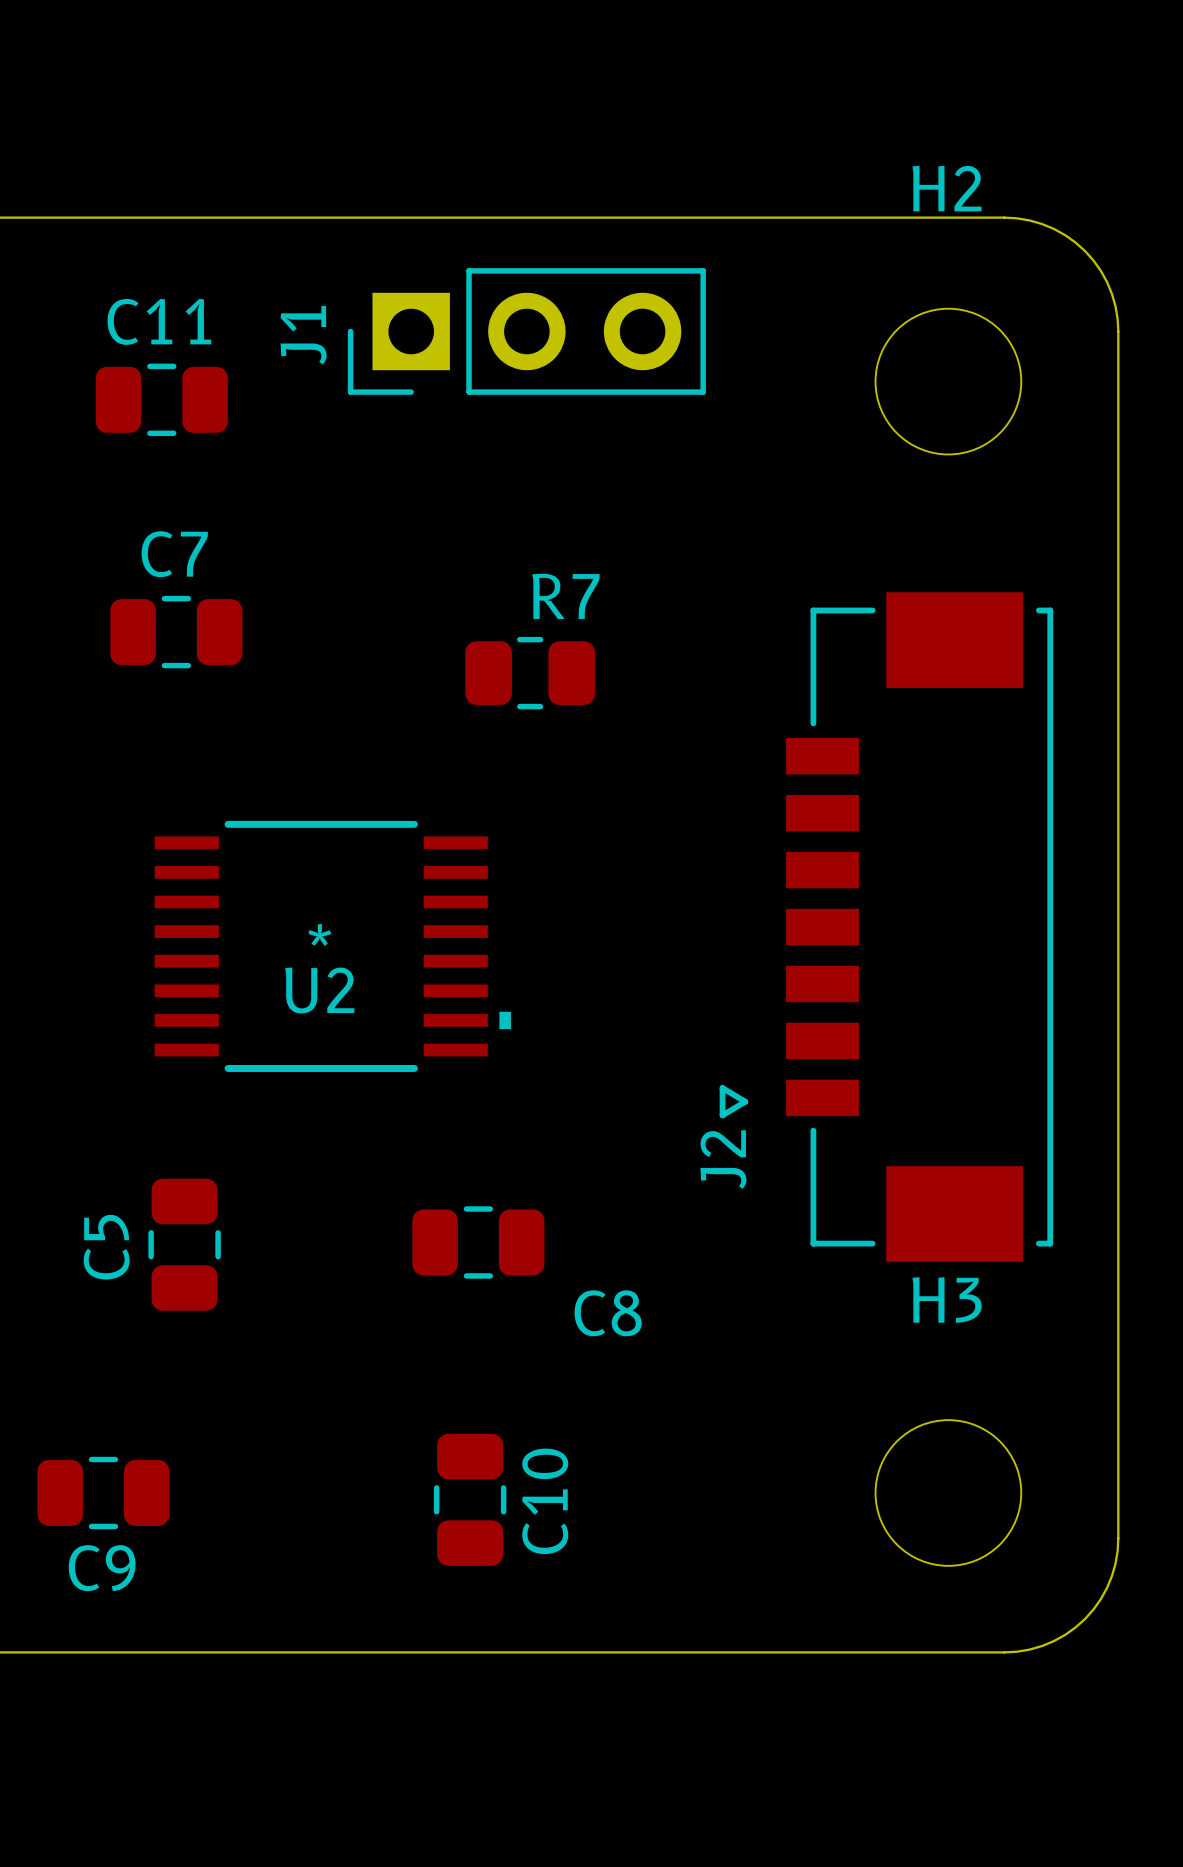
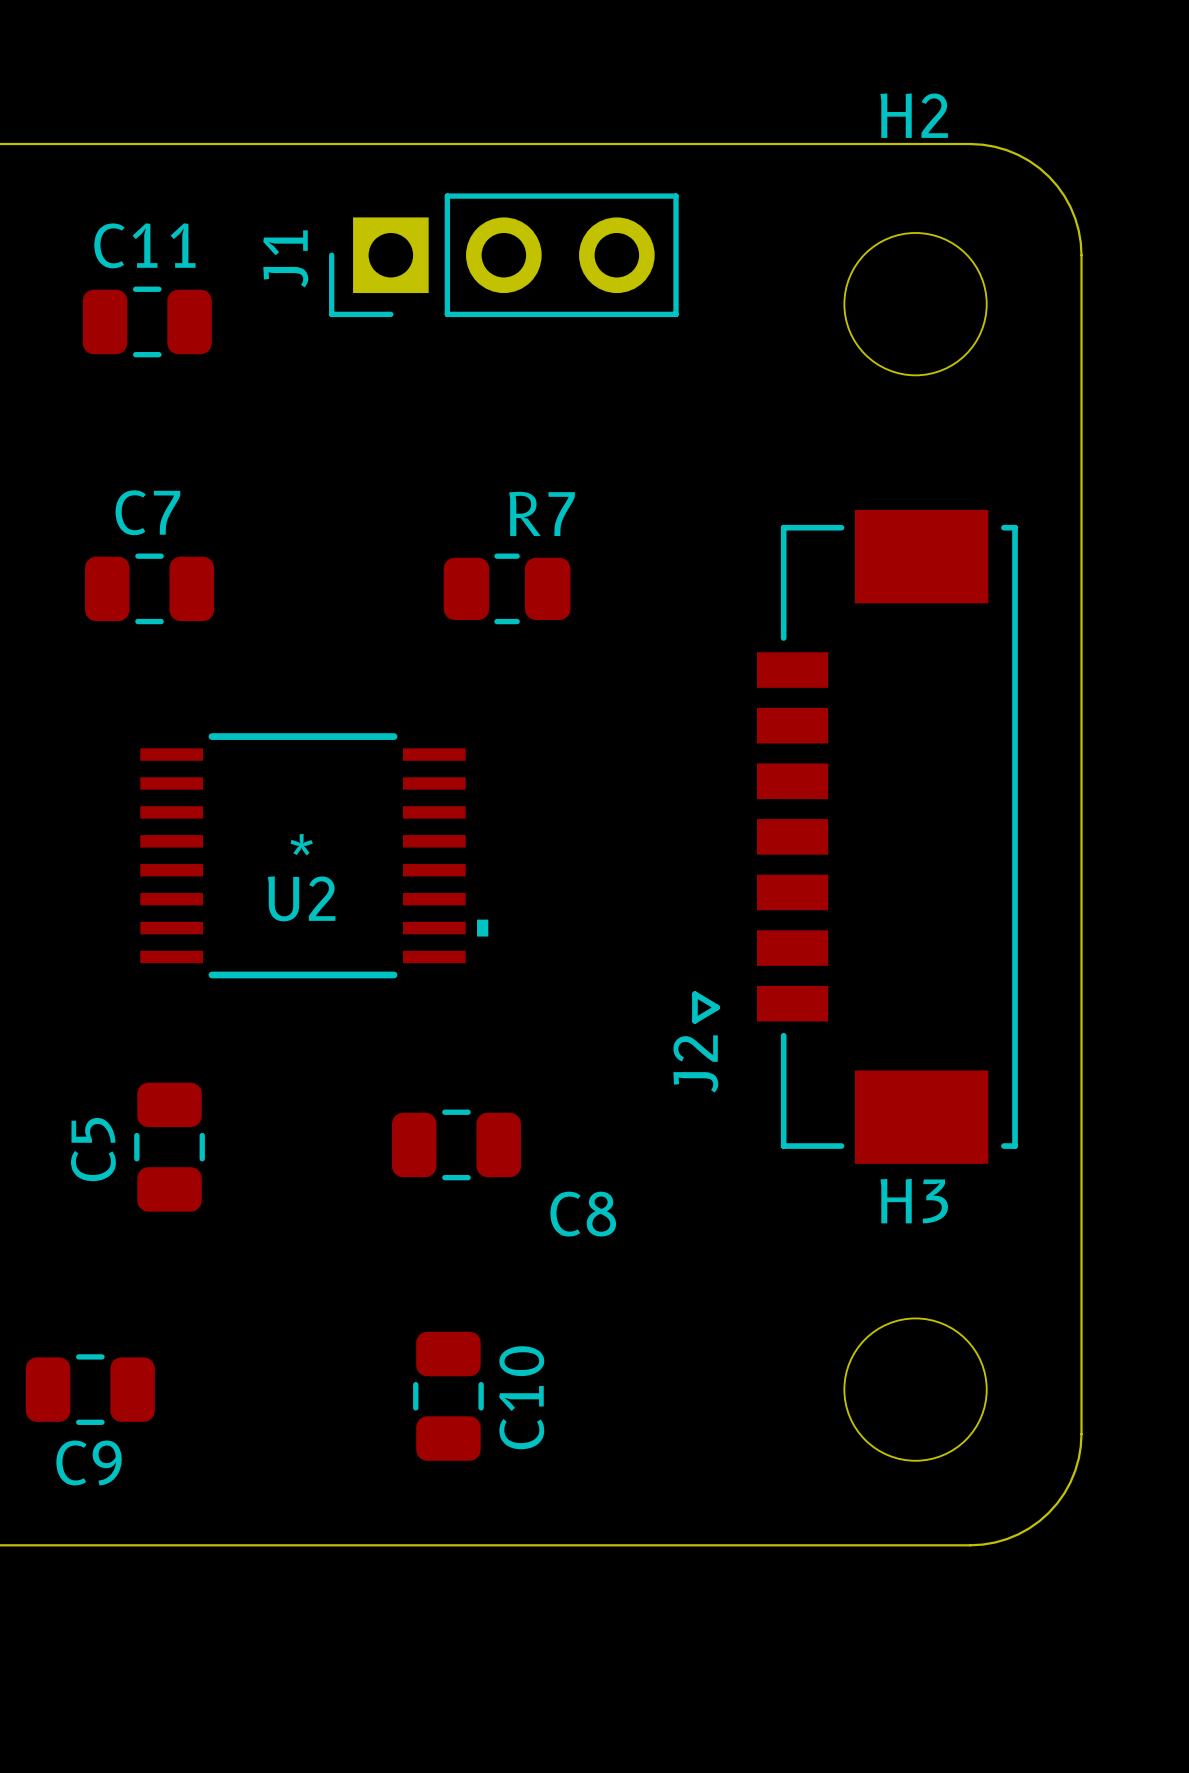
C7 position: (176, 632) -> (149, 588)

